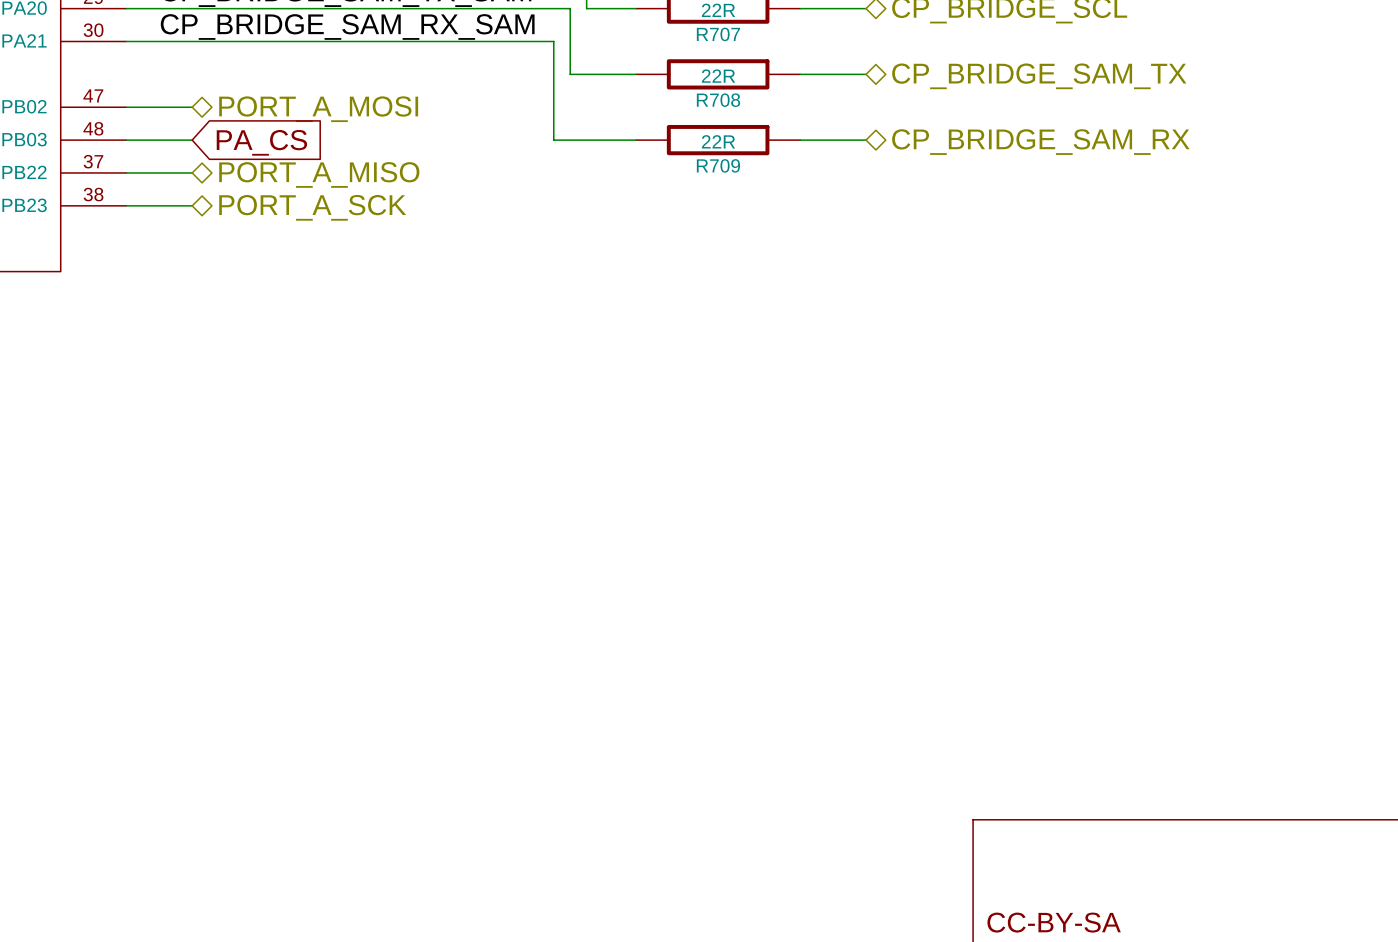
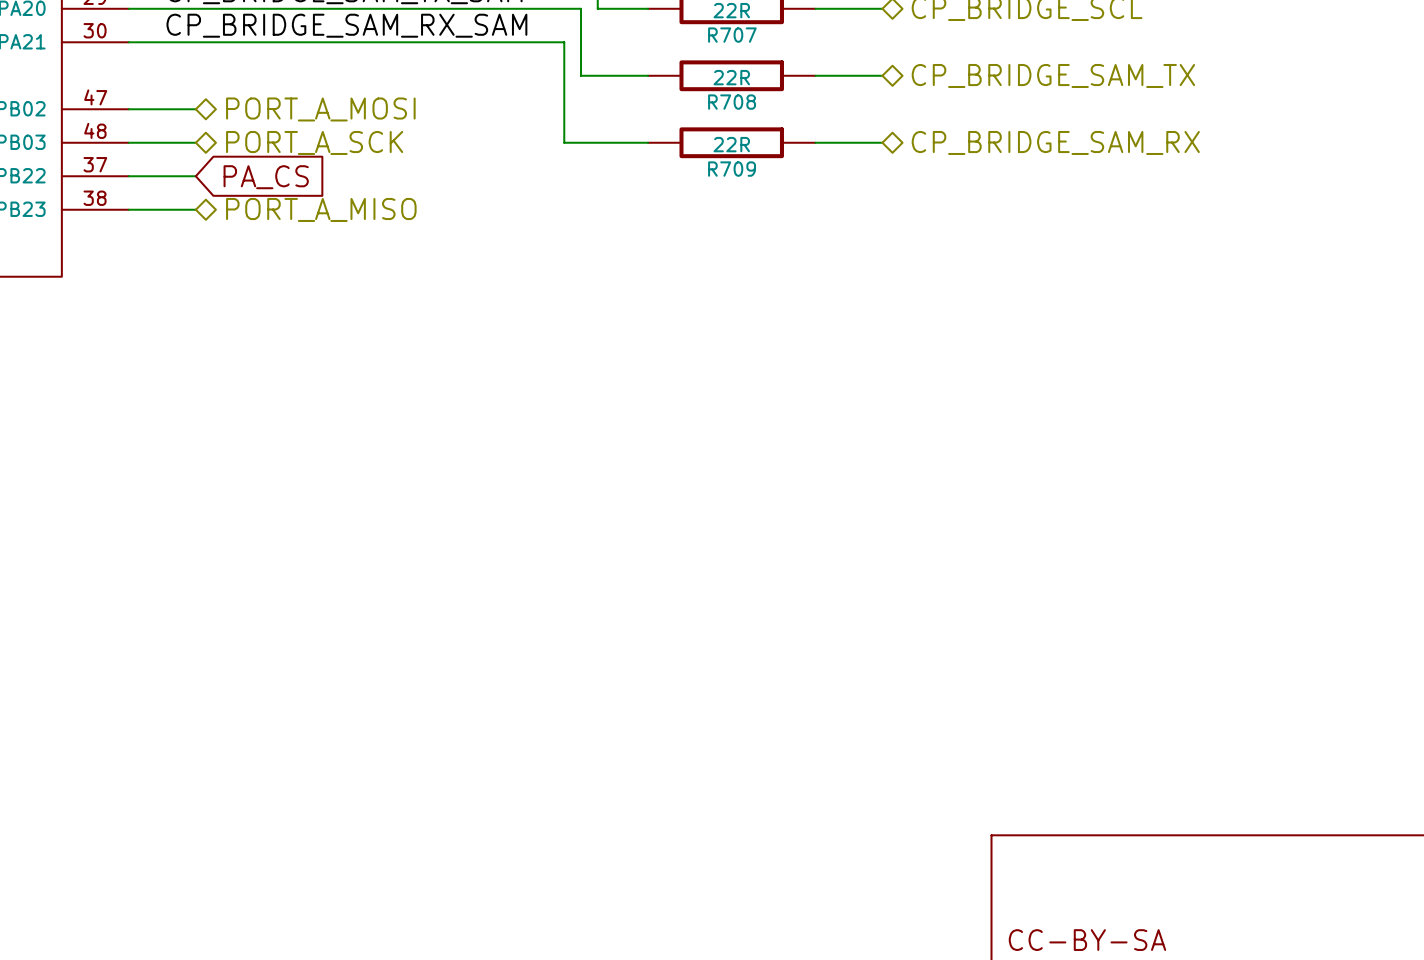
global label position: PA_CS (261, 142) -> PA_CS (266, 177)
hierarchical label: PORT_A_MISO (319, 174) -> PORT_A_SCK (314, 142)
hierarchical label: PORT_A_SCK (312, 207) -> PORT_A_MISO (321, 209)

